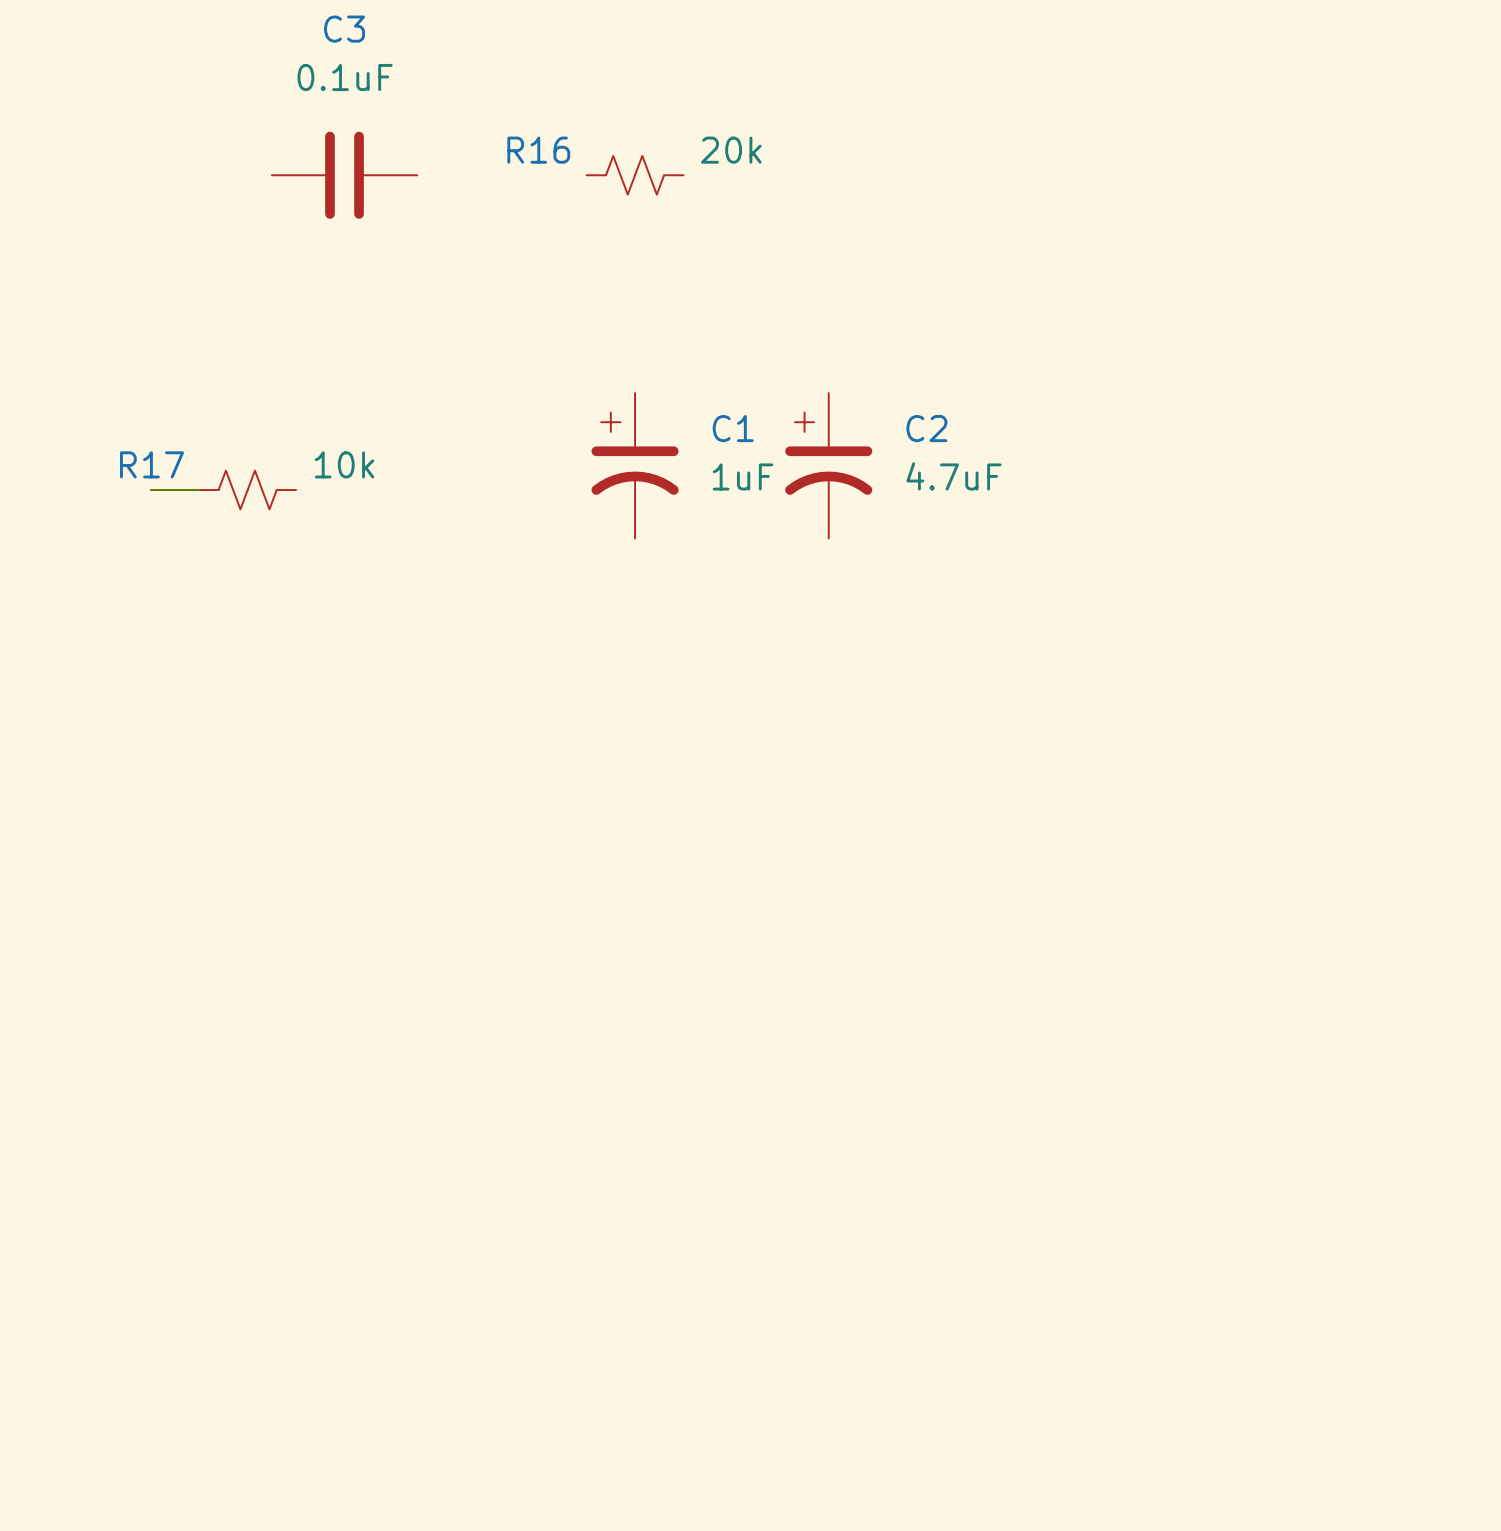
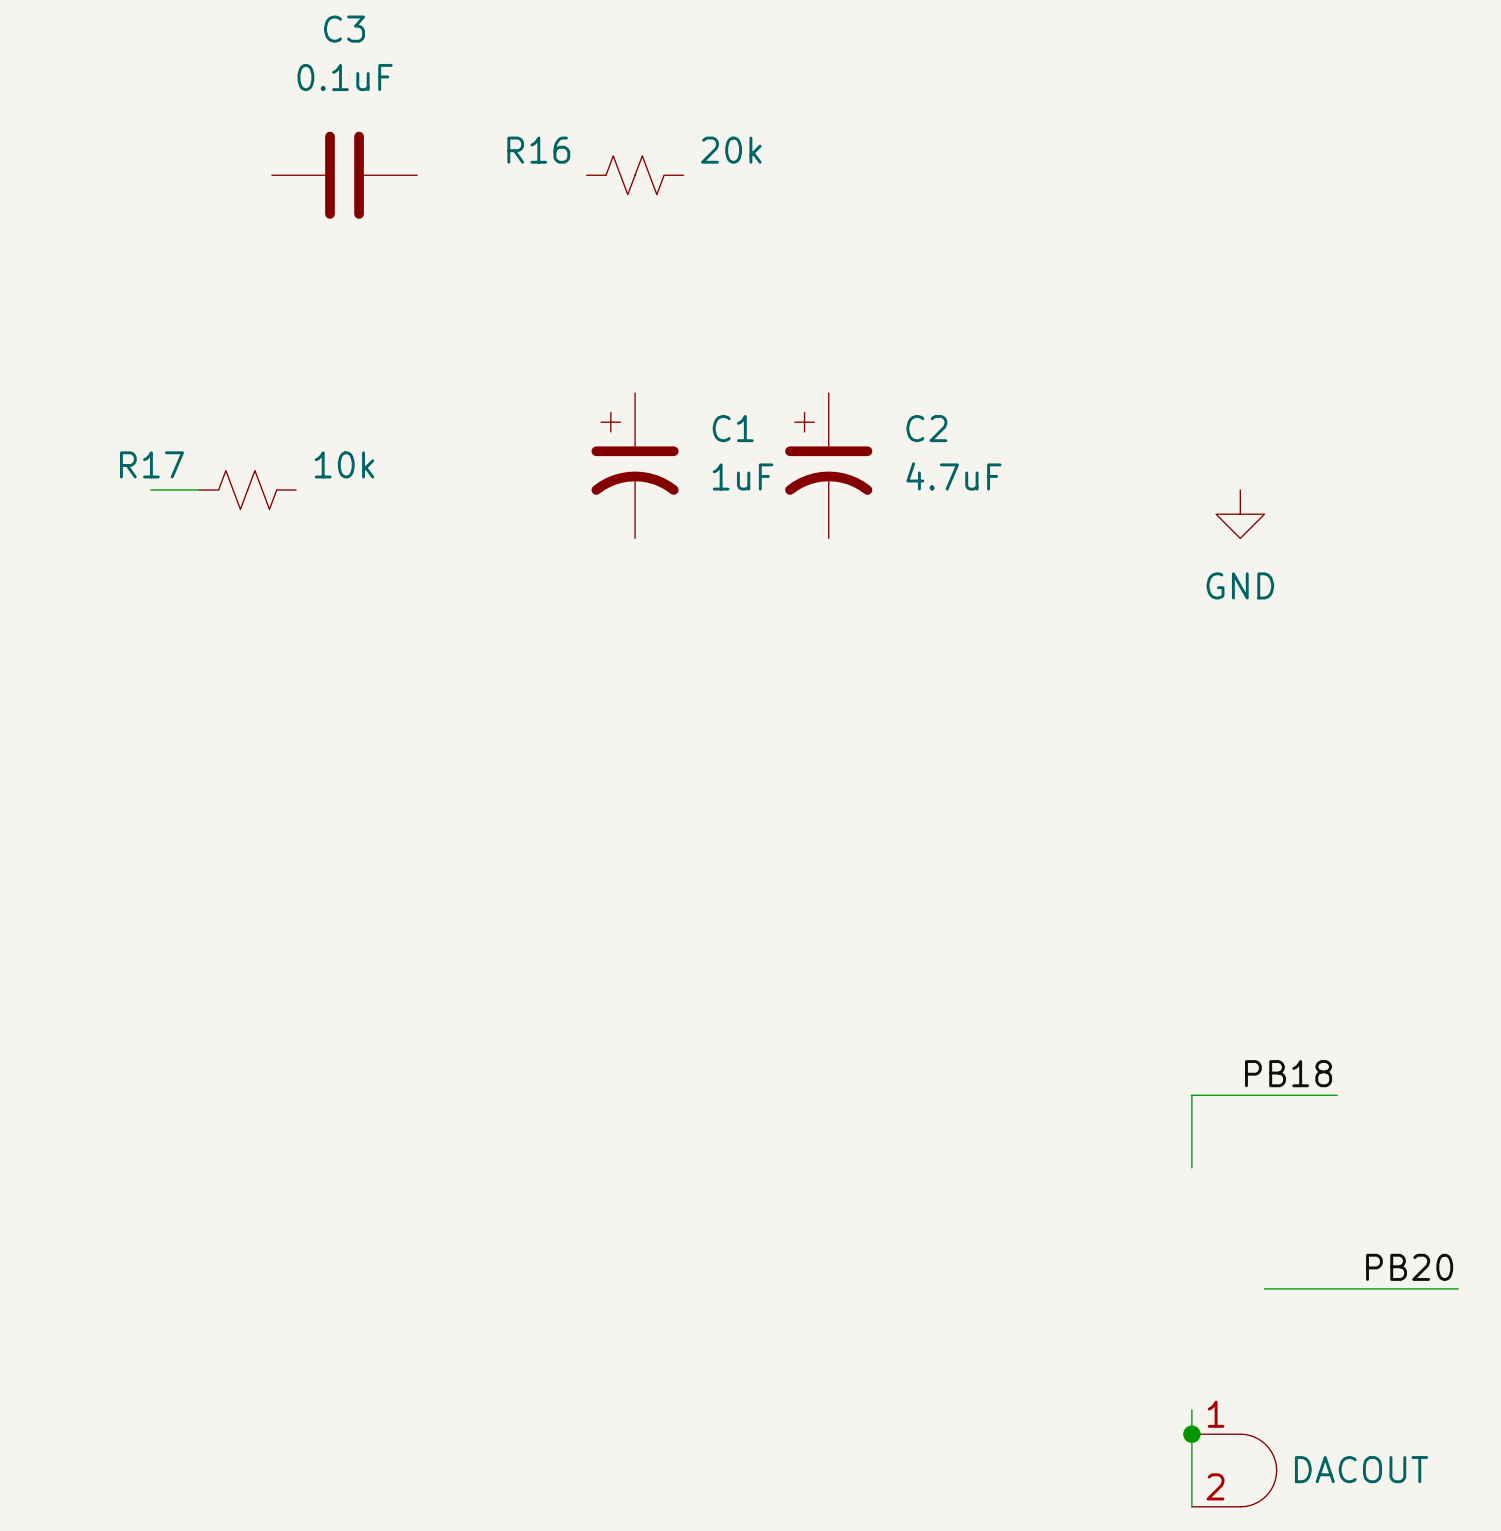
power symbol: none -> GND (1240, 514)
label: none -> PB18 (1288, 1073)
wire: none -> (1337, 1095) (1191, 1095) (1191, 1167)
label: none -> PB20 (1409, 1267)
wire: none -> (1264, 1288) (1458, 1288)
wire: none -> (1191, 1409) (1191, 1506)
junction: none -> (1191, 1434)
part: none -> DACOUT (1234, 1470)

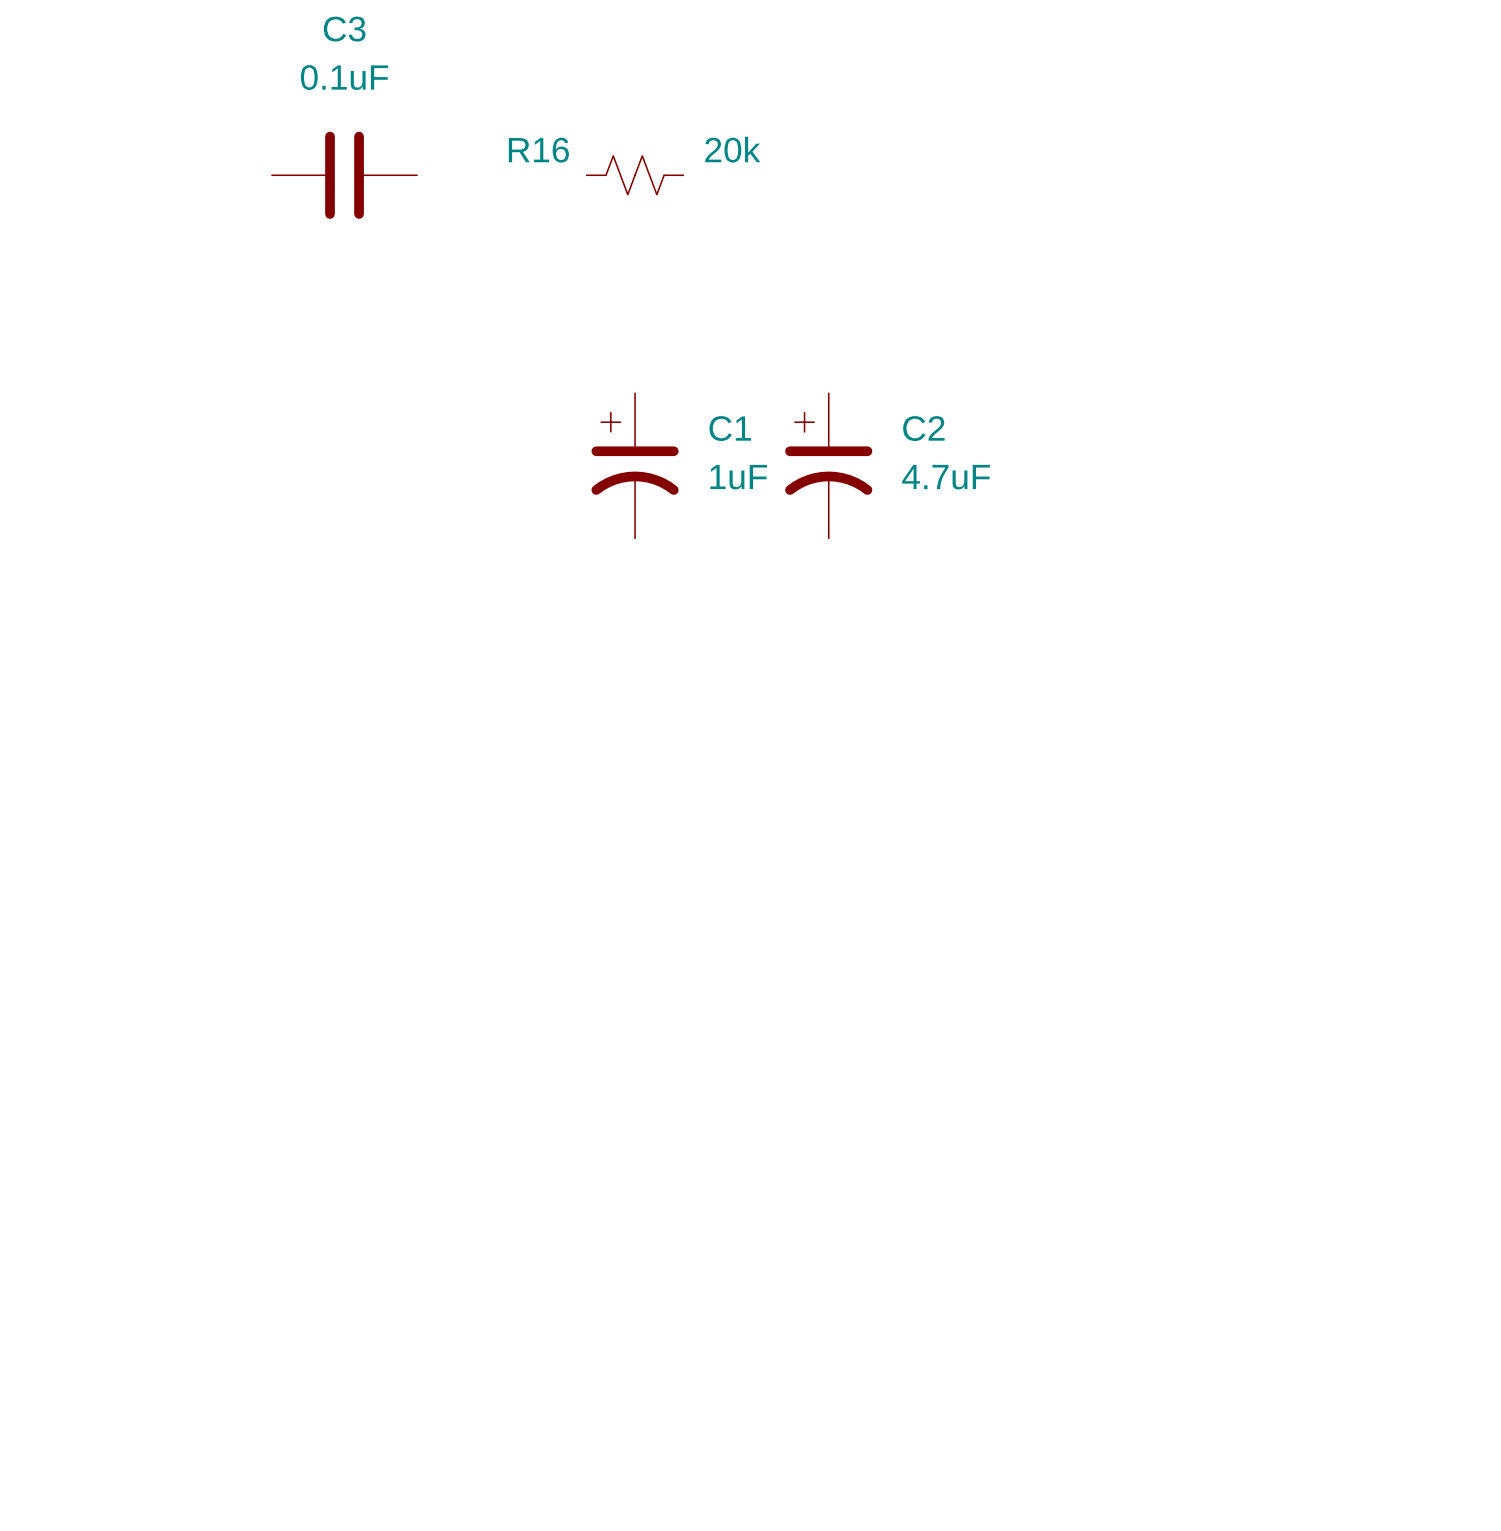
wire: (150, 489) (199, 489) -> none
R17: 10k (247, 489) -> none
power symbol: GND (1240, 514) -> none
label: PB18 (1288, 1073) -> none
wire: (1337, 1095) (1191, 1095) (1191, 1167) -> none
label: PB20 (1409, 1267) -> none
wire: (1264, 1288) (1458, 1288) -> none
wire: (1191, 1409) (1191, 1506) -> none
junction: (1191, 1434) -> none
part: DACOUT (1234, 1470) -> none

